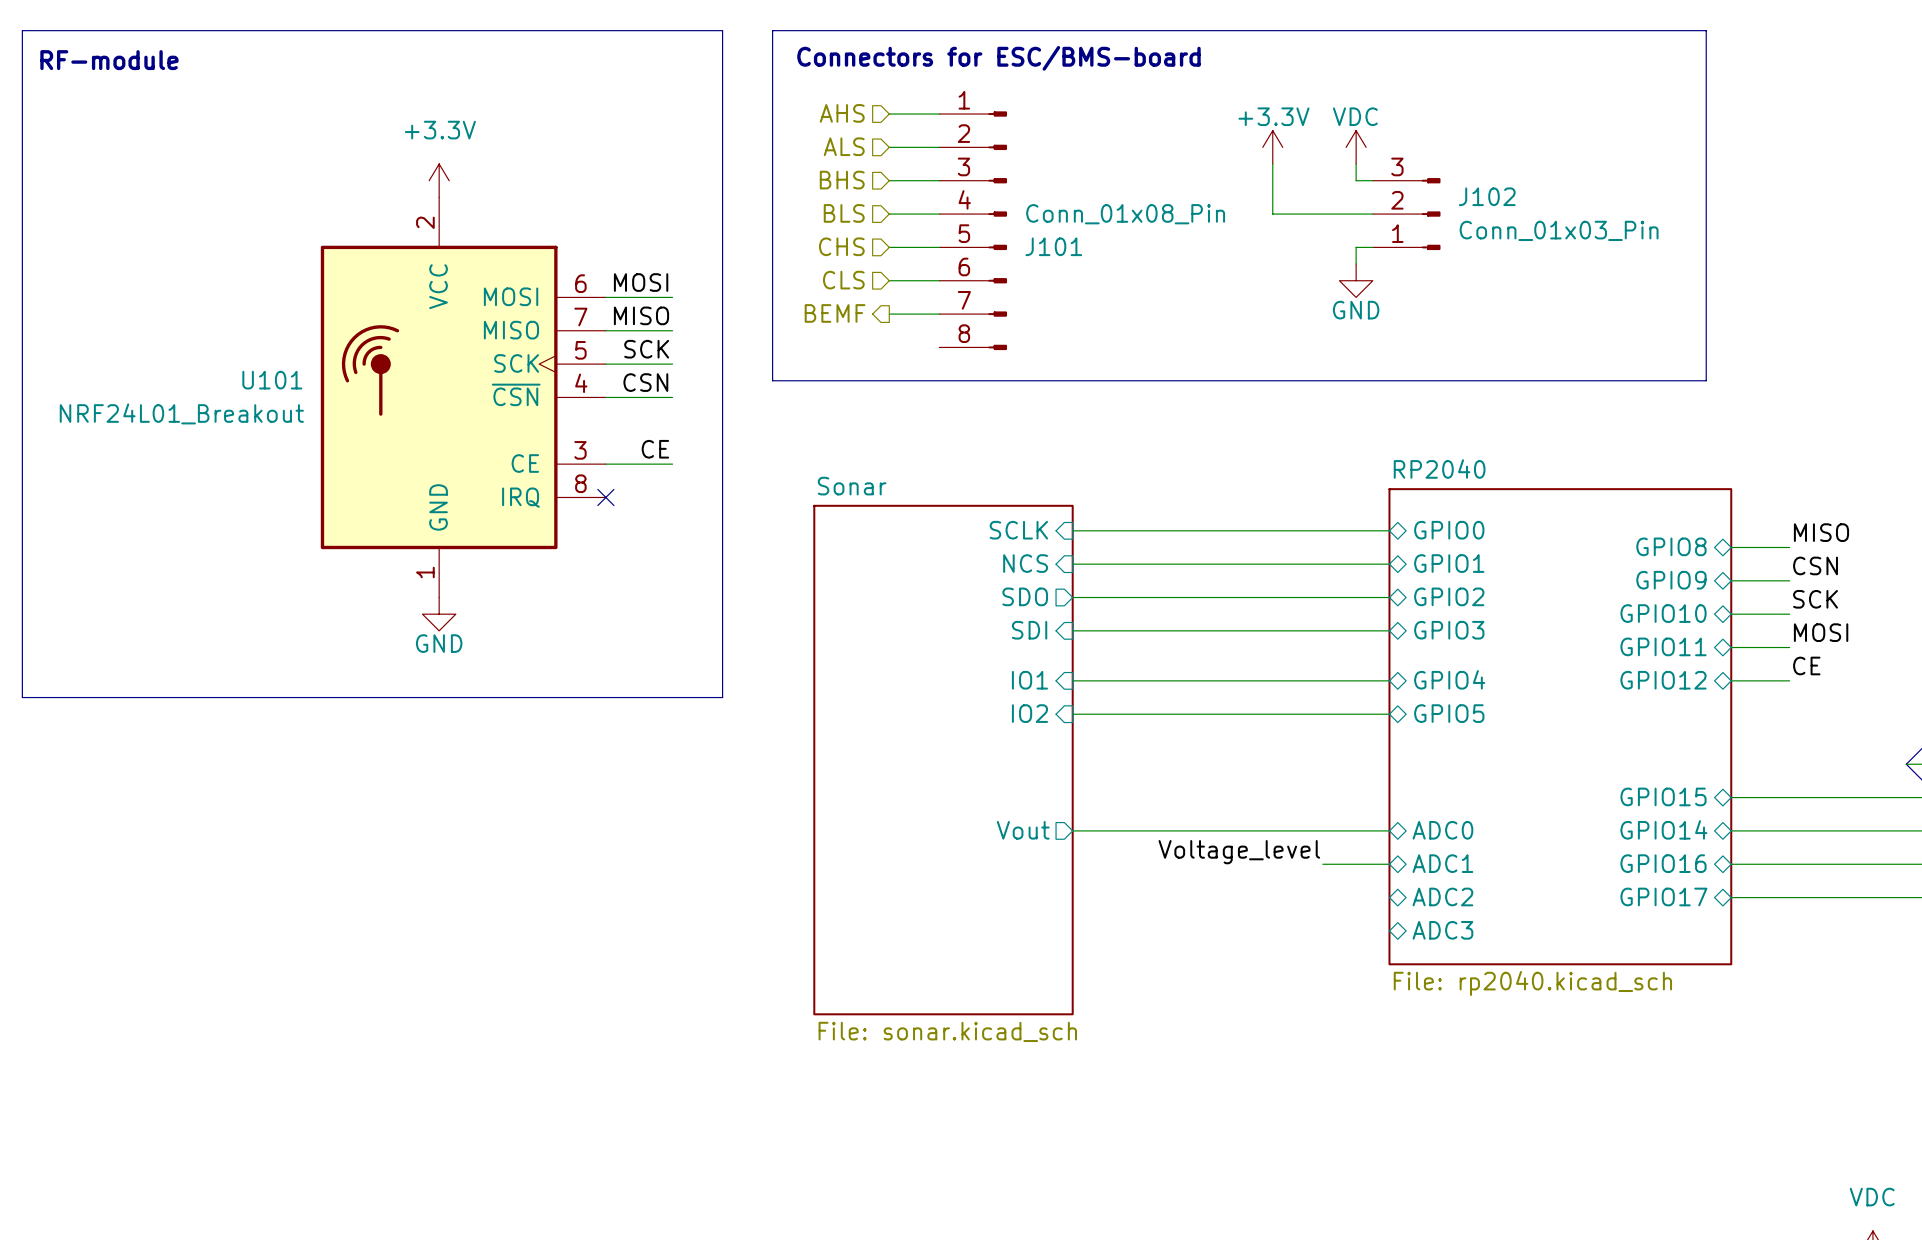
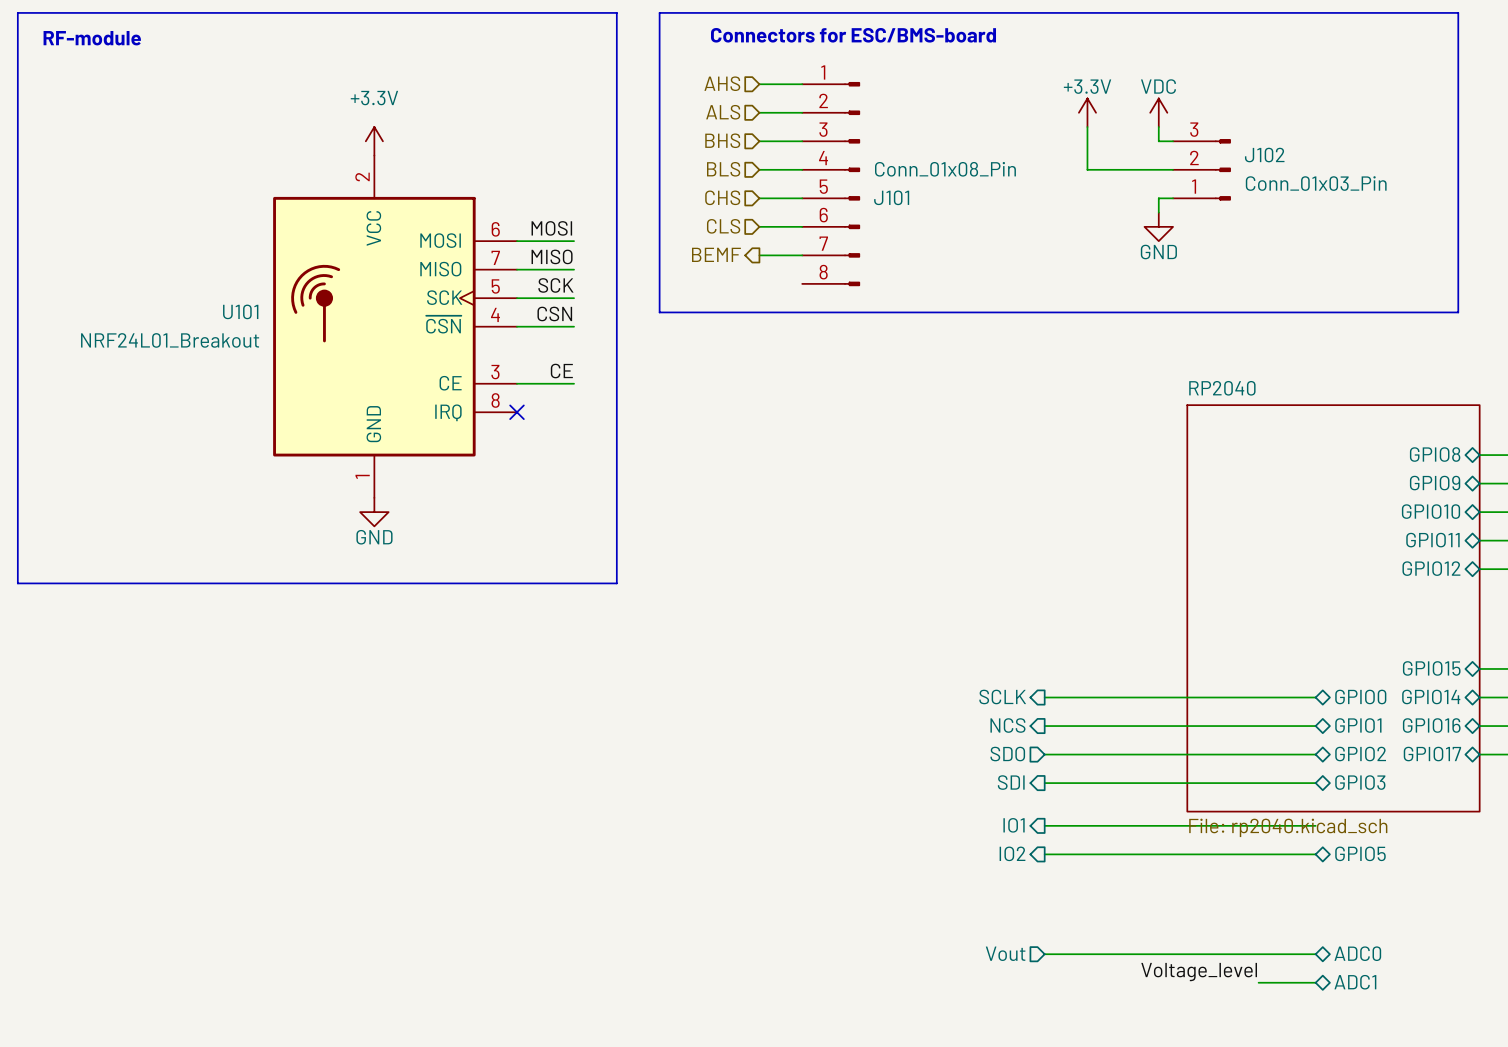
sheet pin: SCLK (1018, 530) -> none
wire: (1072, 530) (1389, 530) -> none
sheet pin: GPIO0 (1449, 530) -> none
sheet pin: NCS (1025, 563) -> none
sheet pin: GPIO1 (1449, 563) -> none
wire: (1072, 564) (1389, 564) -> none
sheet pin: SDO (1025, 596) -> none
sheet pin: GPIO2 (1449, 596) -> none
wire: (1072, 597) (1389, 597) -> none
sheet pin: SDI (1029, 630) -> none
wire: (1072, 630) (1389, 630) -> none
sheet pin: GPIO3 (1449, 630) -> none
sheet pin: GPIO4 (1449, 679) -> none
sheet pin: IO1 (1029, 680) -> none
wire: (1072, 680) (1389, 680) -> (1044, 754) (1315, 754)
sheet pin: IO2 (1029, 713) -> none
sheet pin: GPIO5 (1449, 713) -> none
wire: (1072, 714) (1389, 714) -> (1044, 783) (1315, 783)
sheet Sonar: File: sonar.kicad_sch (943, 760) -> none
sheet pin: Vout (1023, 830) -> none
wire: (1072, 830) (1222, 830) -> (1187, 697) (1315, 697)
sheet pin: none -> SCLK (1002, 696)
sheet pin: ADC0 (1442, 830) -> none
sheet pin: none -> GPIO0 (1360, 696)
label: Voltage_level (1239, 852) -> none
sheet pin: none -> NCS (1007, 725)
sheet pin: ADC1 (1442, 863) -> none
sheet pin: none -> GPIO1 (1358, 725)
wire: none -> (1044, 726) (1130, 726)
wire: none -> (1187, 726) (1315, 726)
sheet pin: none -> SDO (1007, 754)
sheet pin: ADC2 (1442, 896) -> none
sheet pin: none -> GPIO2 (1360, 754)
sheet pin: none -> SDI (1011, 782)
sheet pin: ADC3 (1442, 930) -> none
sheet pin: none -> GPIO3 (1360, 782)
sheet pin: none -> IO1 (1014, 825)
wire: none -> (1044, 825) (1315, 825)
sheet pin: none -> IO2 (1012, 853)
sheet pin: none -> GPIO5 (1360, 853)
wire: none -> (1044, 854) (1315, 854)
sheet pin: none -> Vout (1005, 953)
sheet pin: none -> ADC0 (1357, 953)
wire: none -> (1044, 954) (1315, 954)
label: none -> Voltage_level (1199, 972)
sheet pin: none -> ADC1 (1355, 982)
wire: none -> (1258, 982) (1315, 982)

